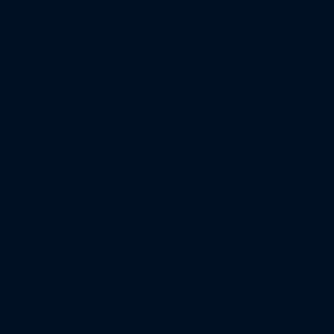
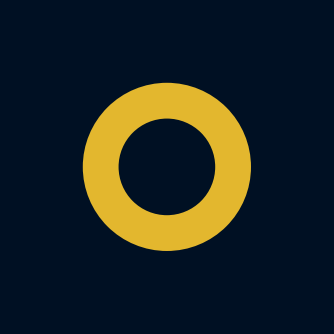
part: none -> (166, 166)

